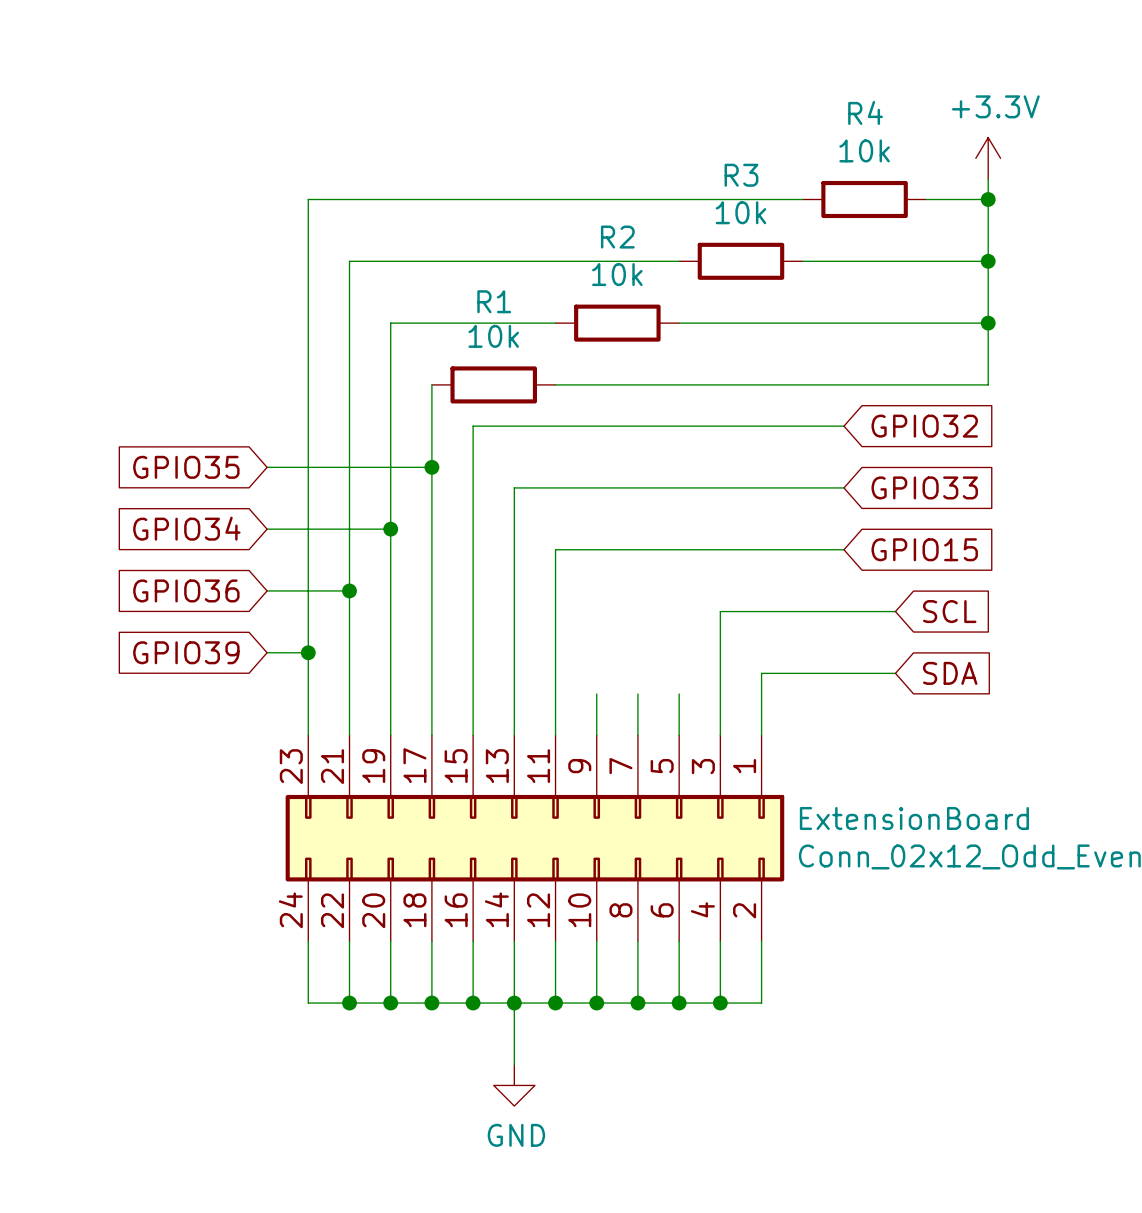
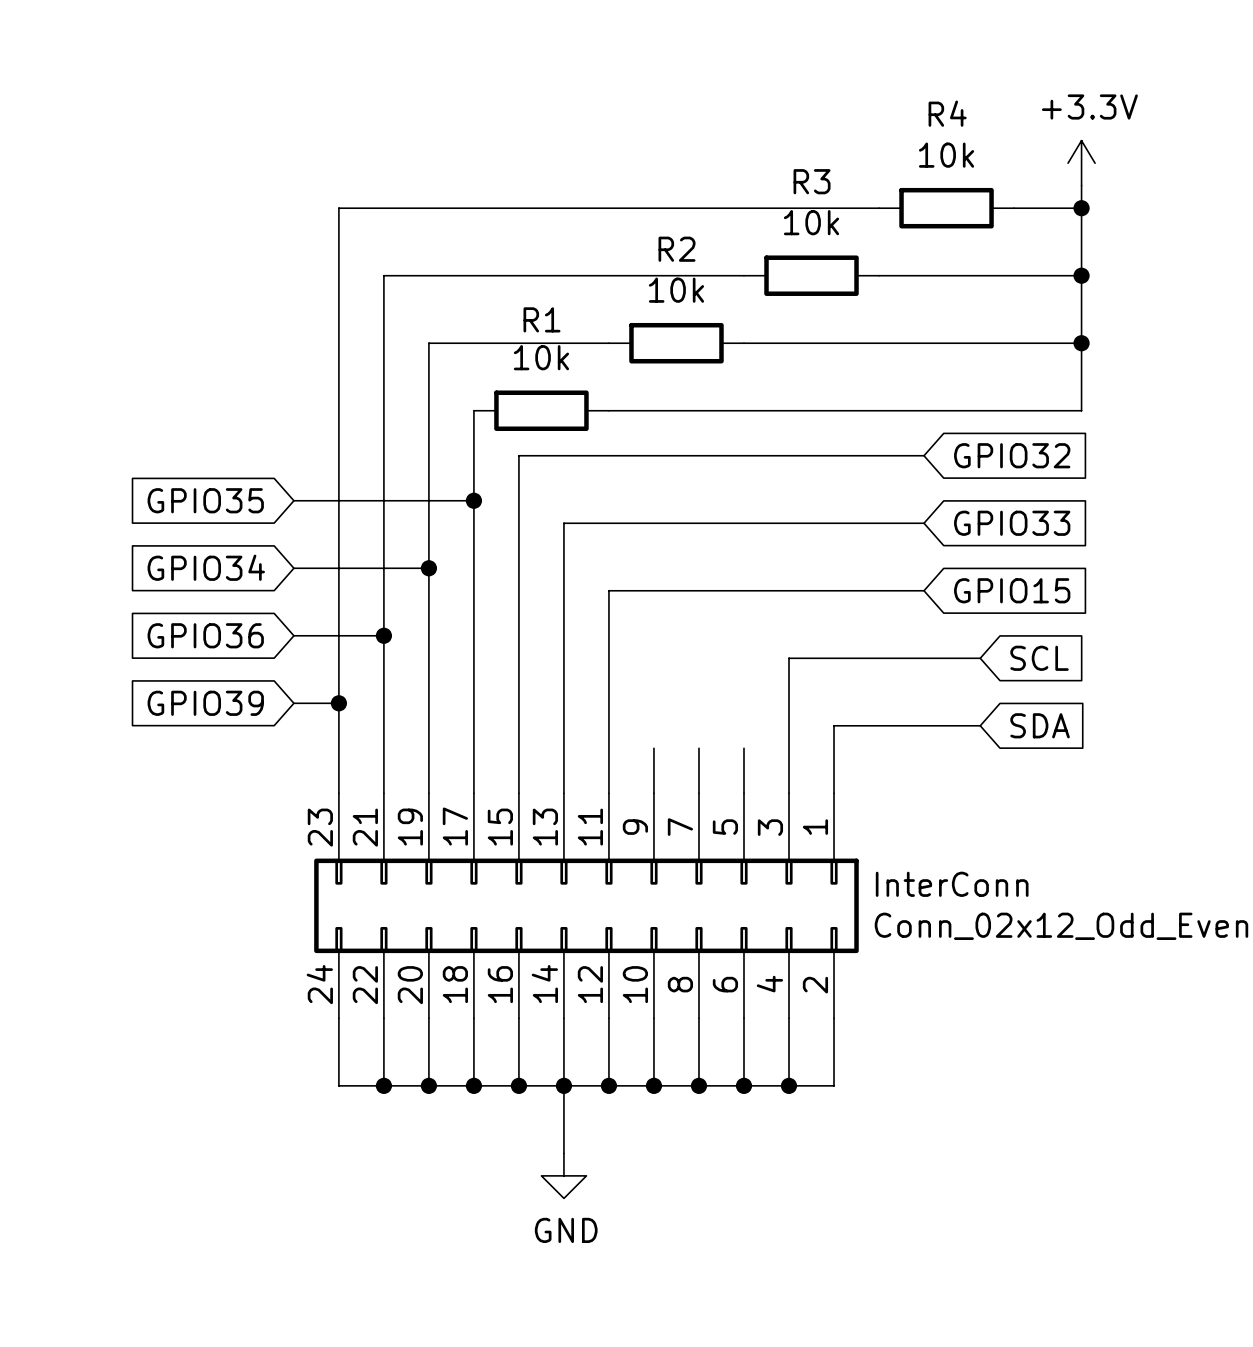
ExtensionBoard name: ExtensionBoard (914, 818) -> InterConn (952, 884)

